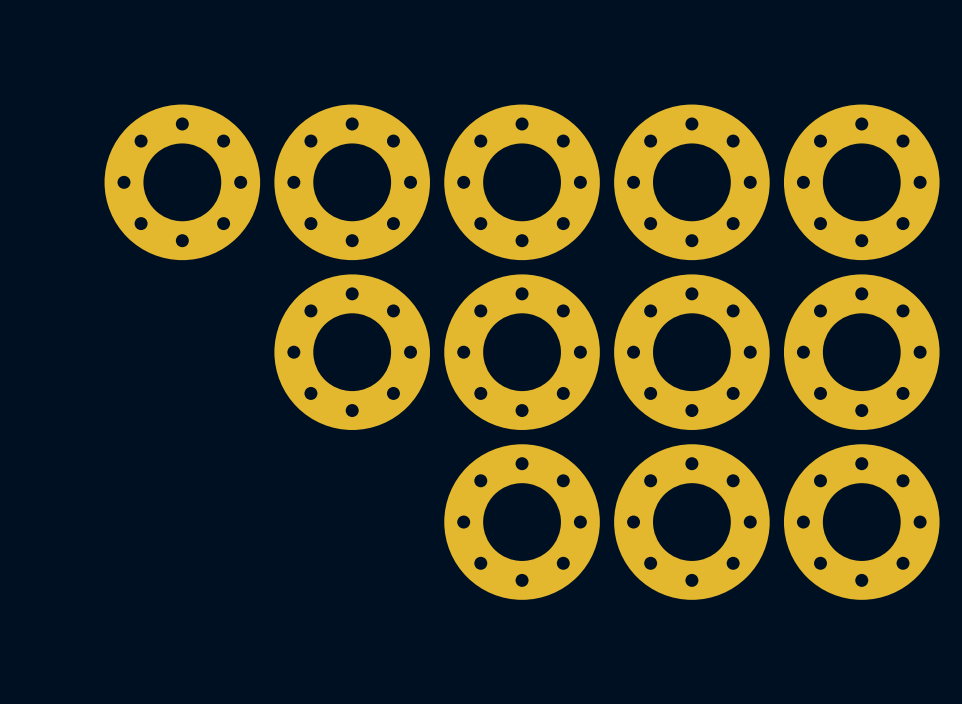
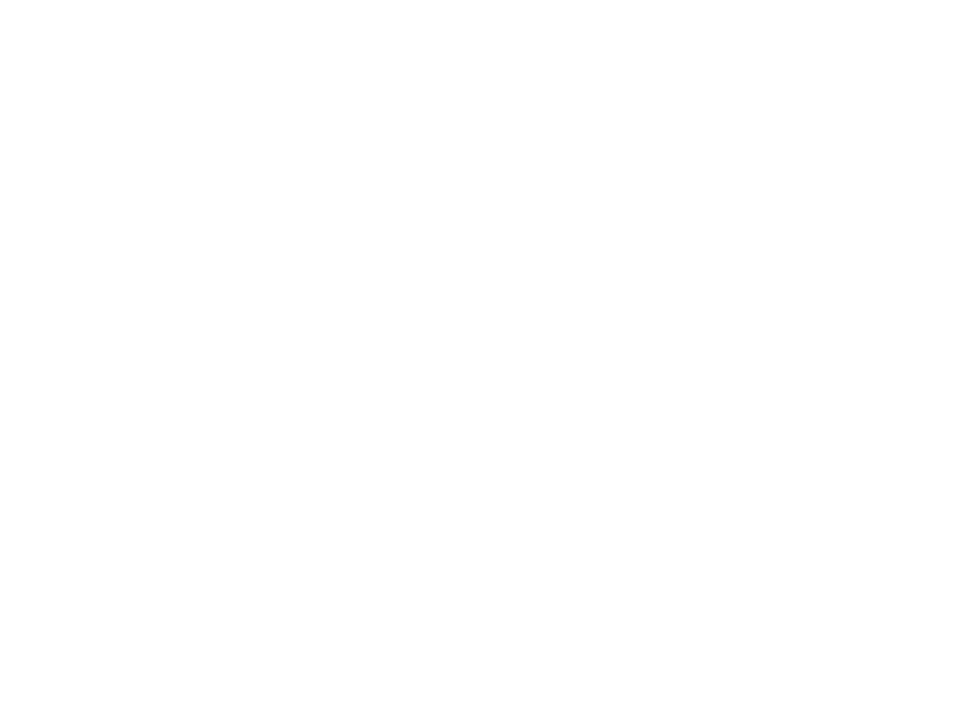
part: (182, 182) -> none
part: (352, 182) -> none
part: (522, 182) -> none
part: (691, 182) -> none
part: (861, 182) -> none
part: (352, 352) -> none
part: (522, 352) -> none
part: (691, 352) -> none
part: (861, 352) -> none
part: (522, 522) -> none
part: (691, 522) -> none
part: (861, 522) -> none

